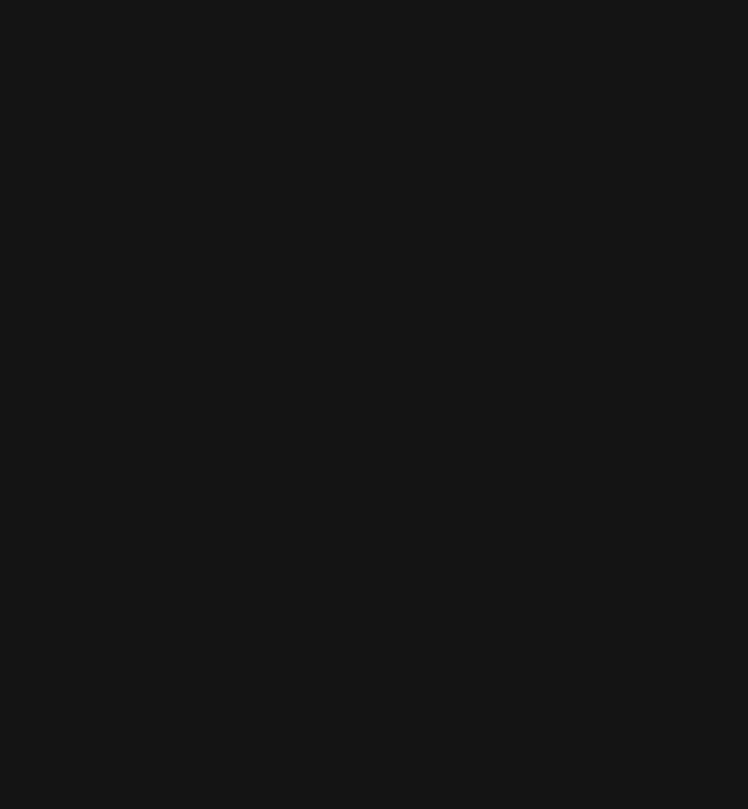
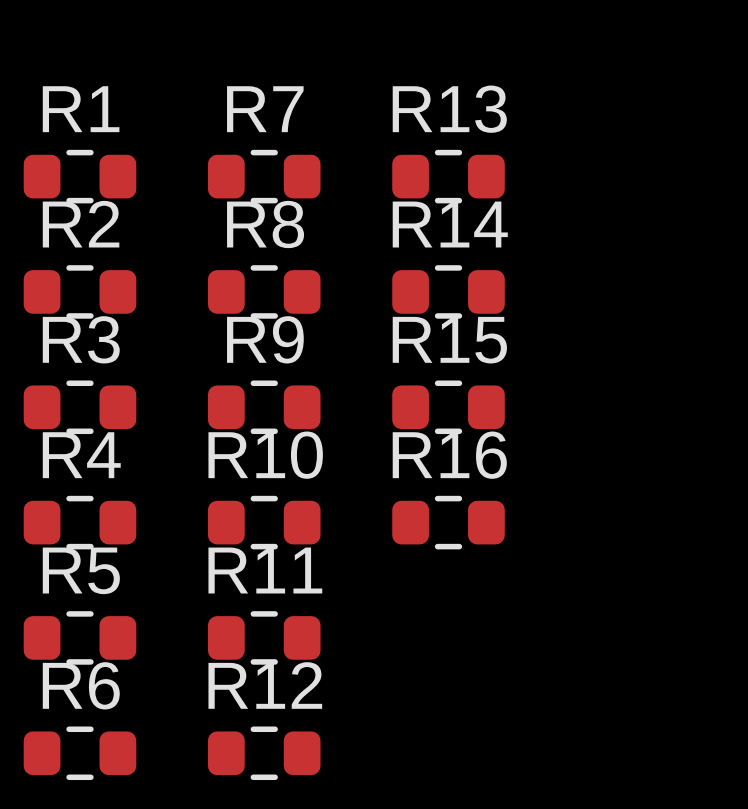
R1: none -> (79, 176)
R7: none -> (264, 176)
R13: none -> (448, 176)
R2: none -> (79, 291)
R8: none -> (264, 291)
R14: none -> (448, 291)
R3: none -> (79, 407)
R9: none -> (264, 407)
R15: none -> (448, 407)
R4: none -> (79, 522)
R10: none -> (264, 522)
R16: none -> (448, 522)
R5: none -> (79, 637)
R11: none -> (264, 637)
R6: none -> (79, 753)
R12: none -> (264, 753)

